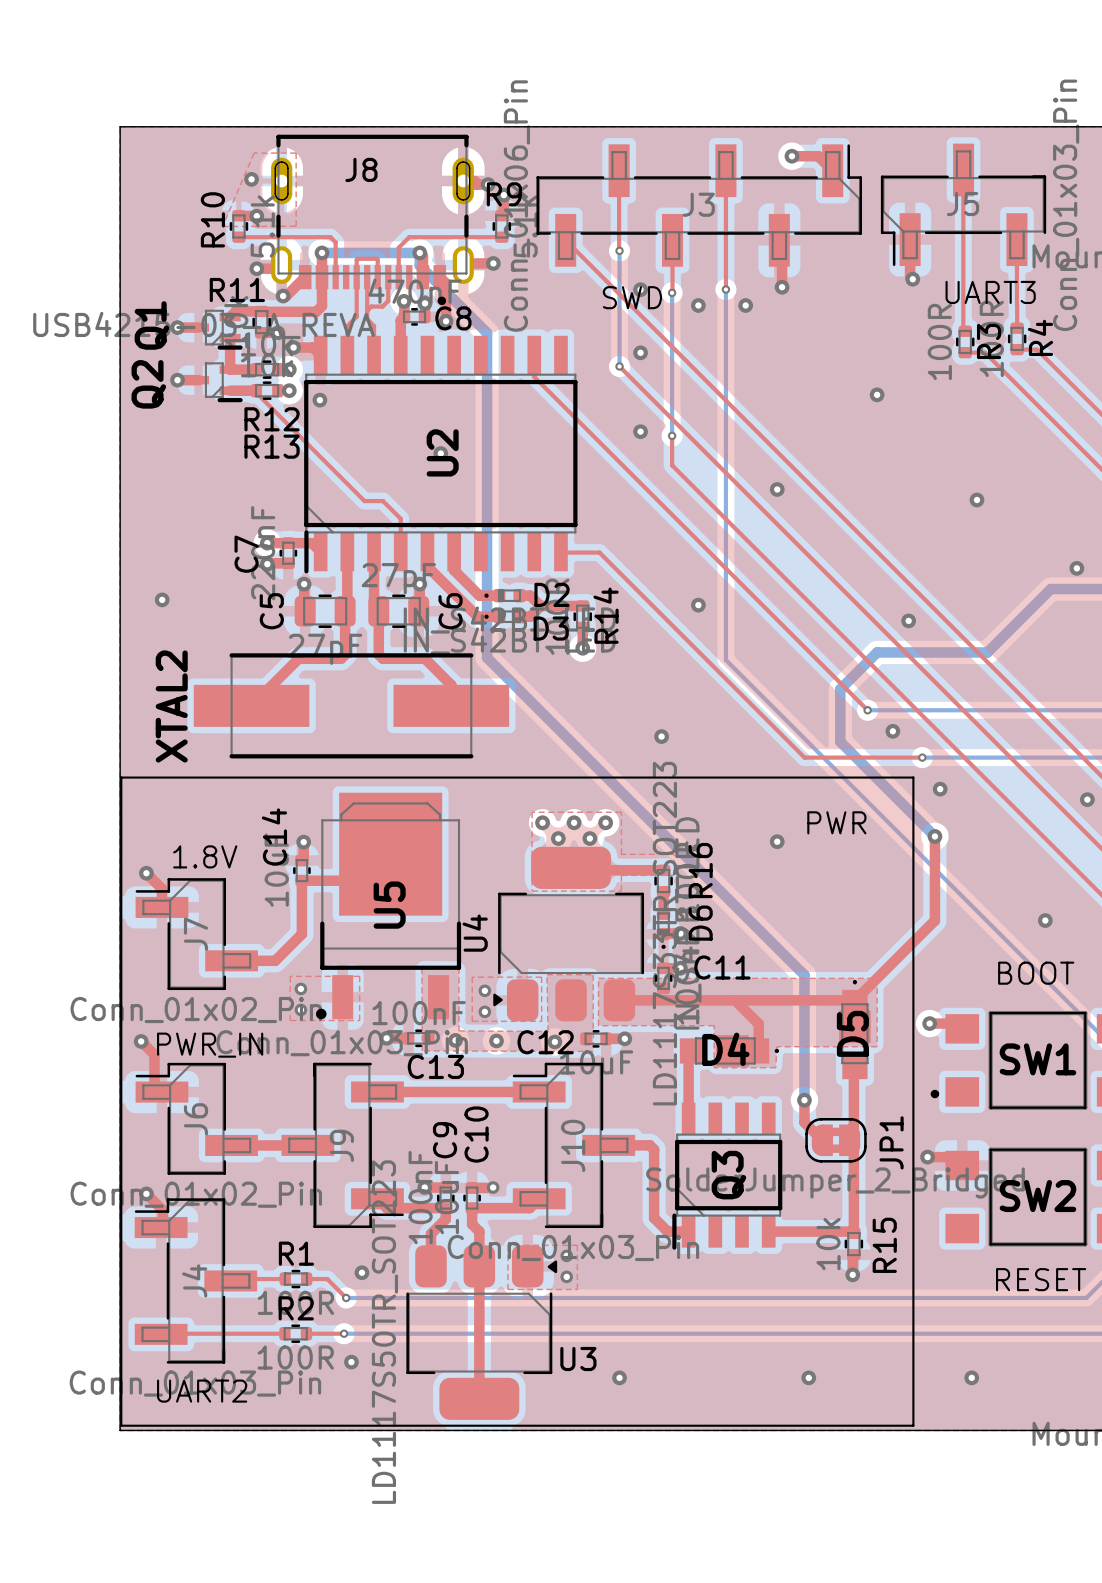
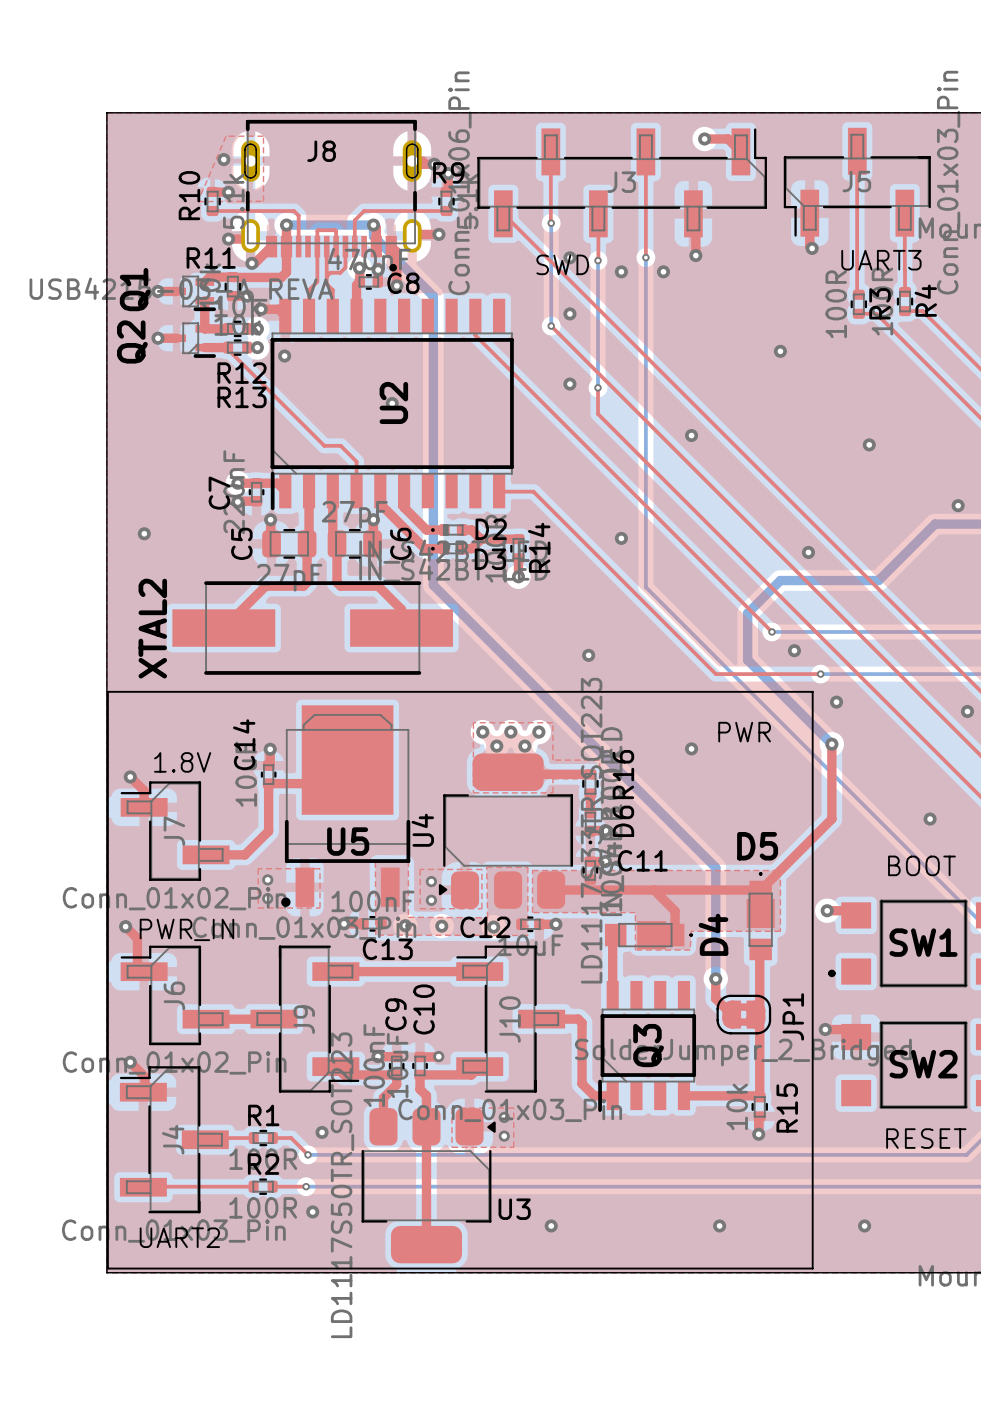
U5 name rotation: 0° (389, 905) -> 90° clockwise (348, 841)
D5 name rotation: 0° (852, 1033) -> 90° clockwise (757, 846)
D5 name position: D5 (852, 1033) -> D5 (757, 846)
D4 name rotation: 0° (725, 1049) -> 90° counterclockwise (713, 934)
D4 name position: D4 (725, 1049) -> D4 (713, 934)

